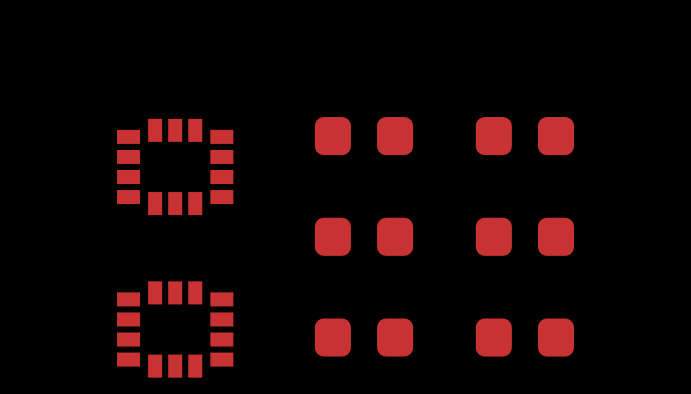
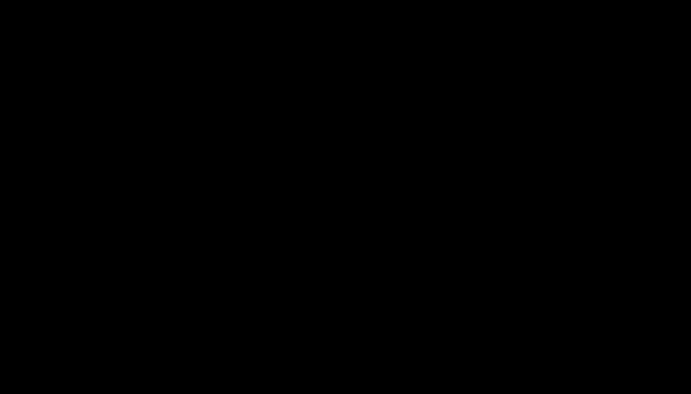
part: (363, 136) -> none
part: (524, 136) -> none
part: (175, 166) -> none
part: (363, 236) -> none
part: (524, 236) -> none
part: (175, 329) -> none
part: (363, 337) -> none
part: (524, 337) -> none

